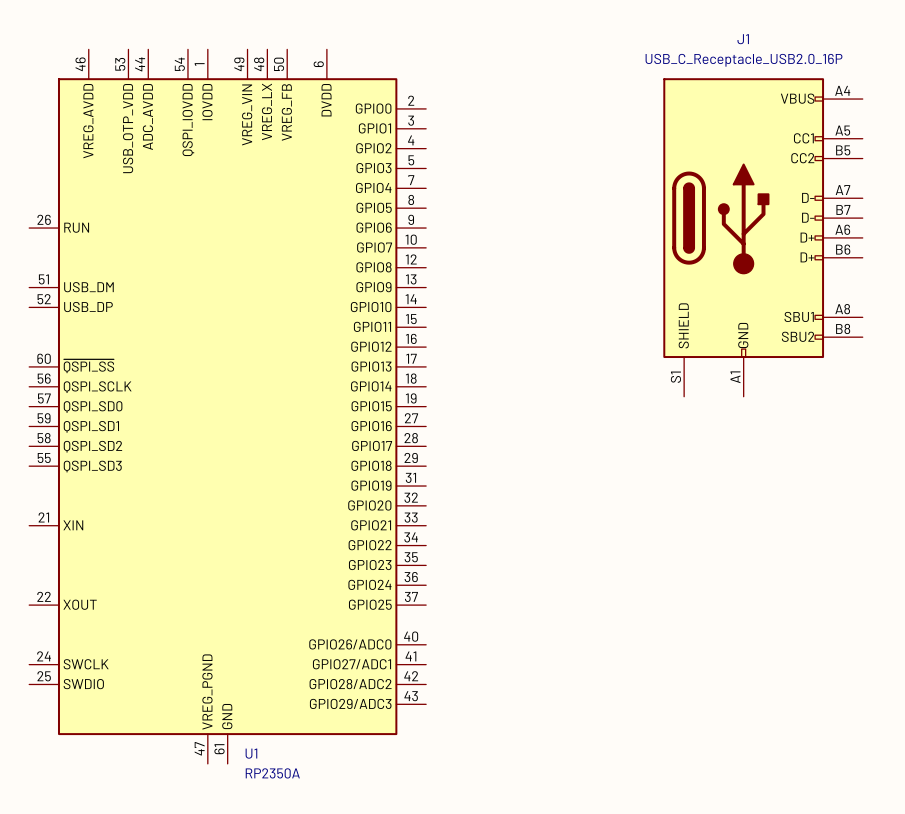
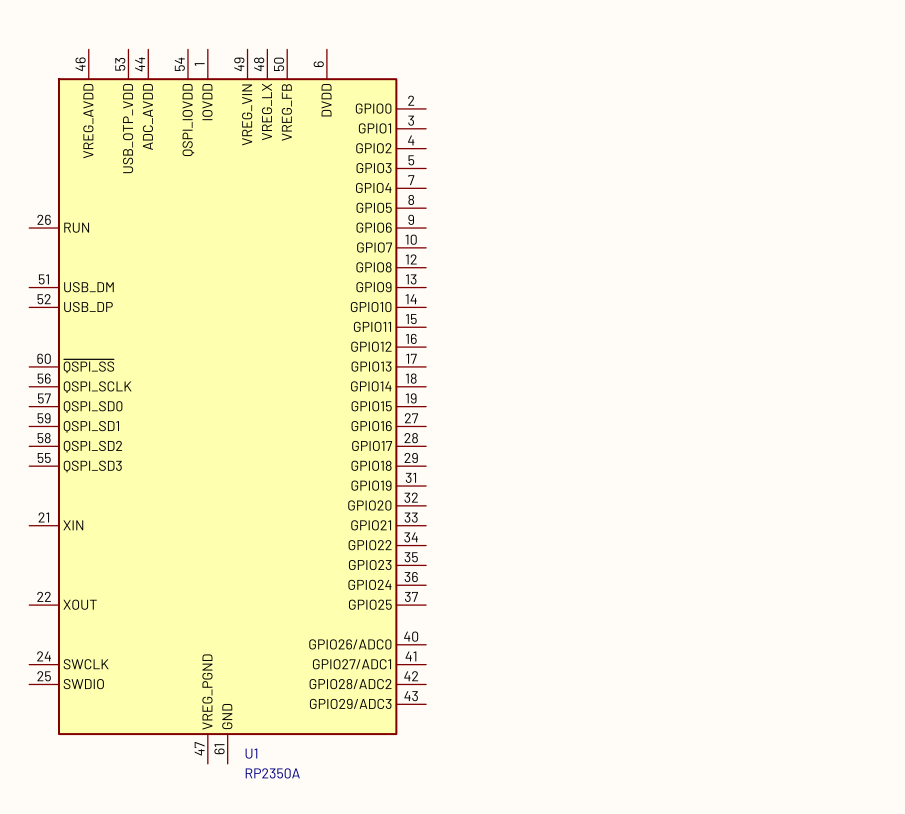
J1: USB_C_Receptacle_USB2.0_16P (763, 237) -> none

